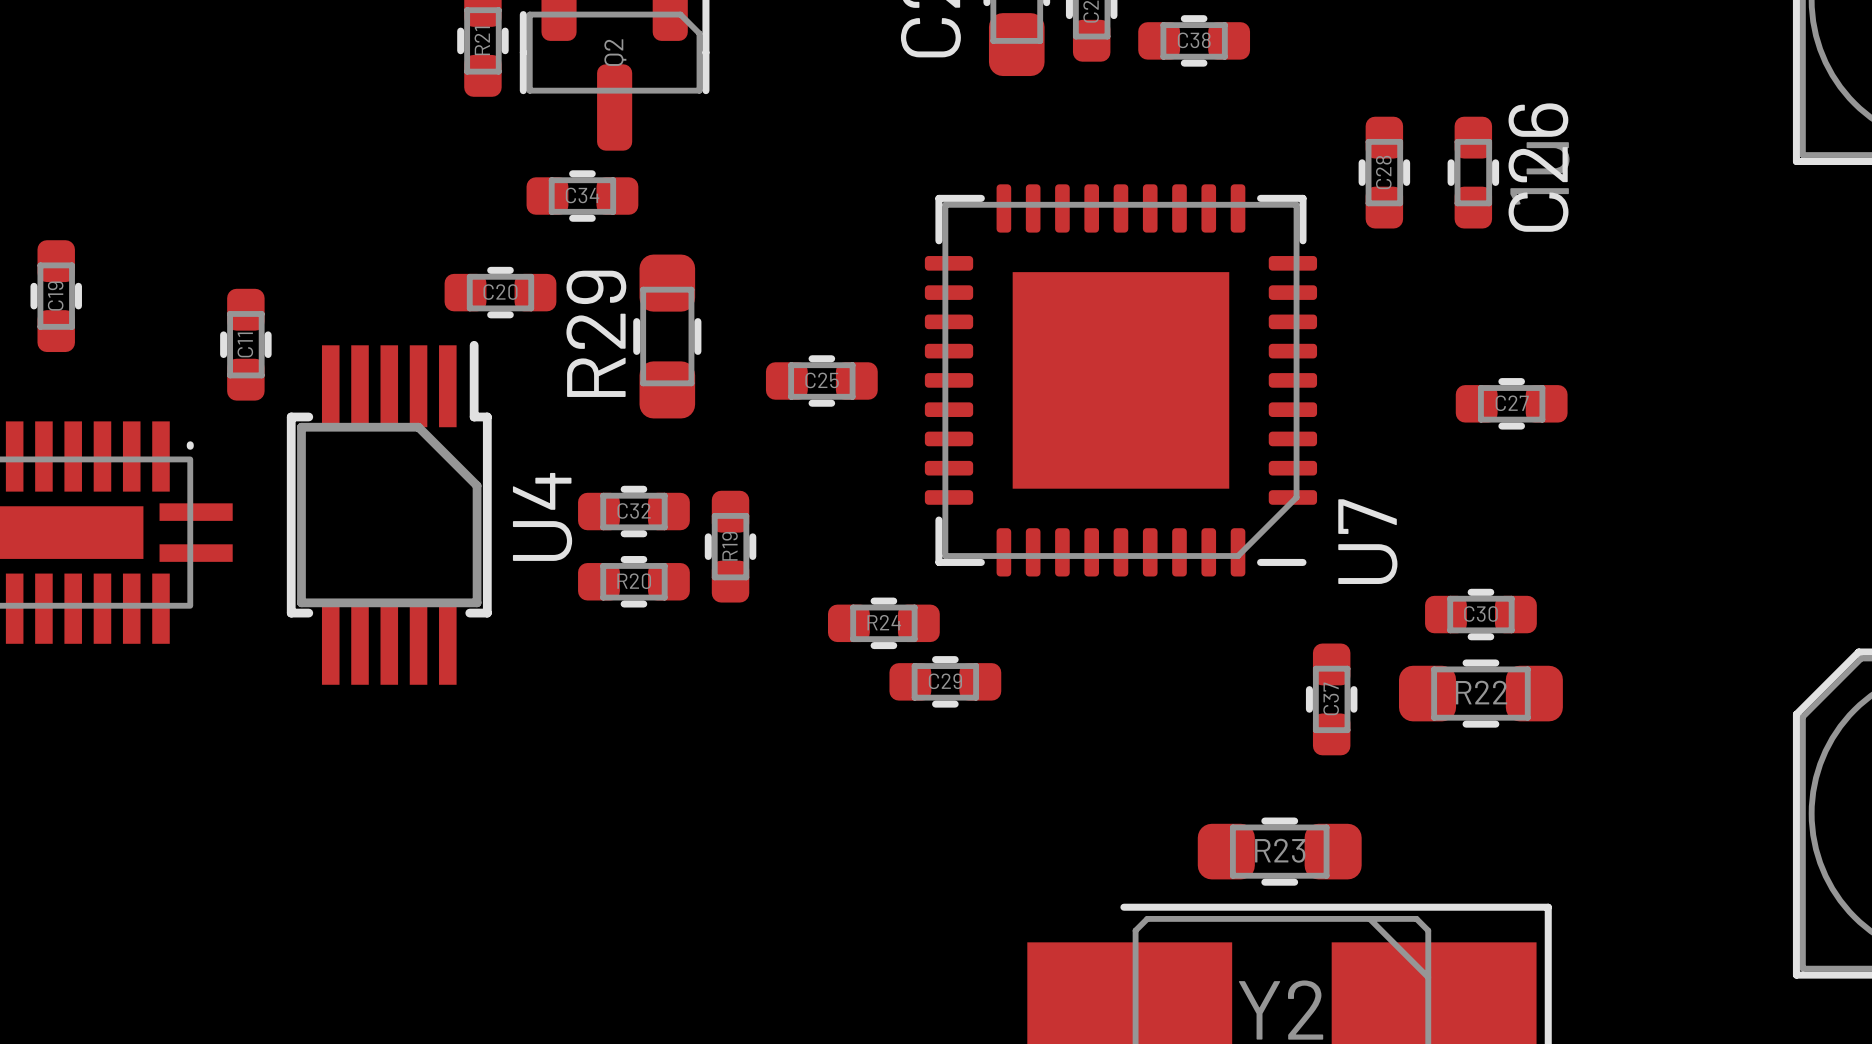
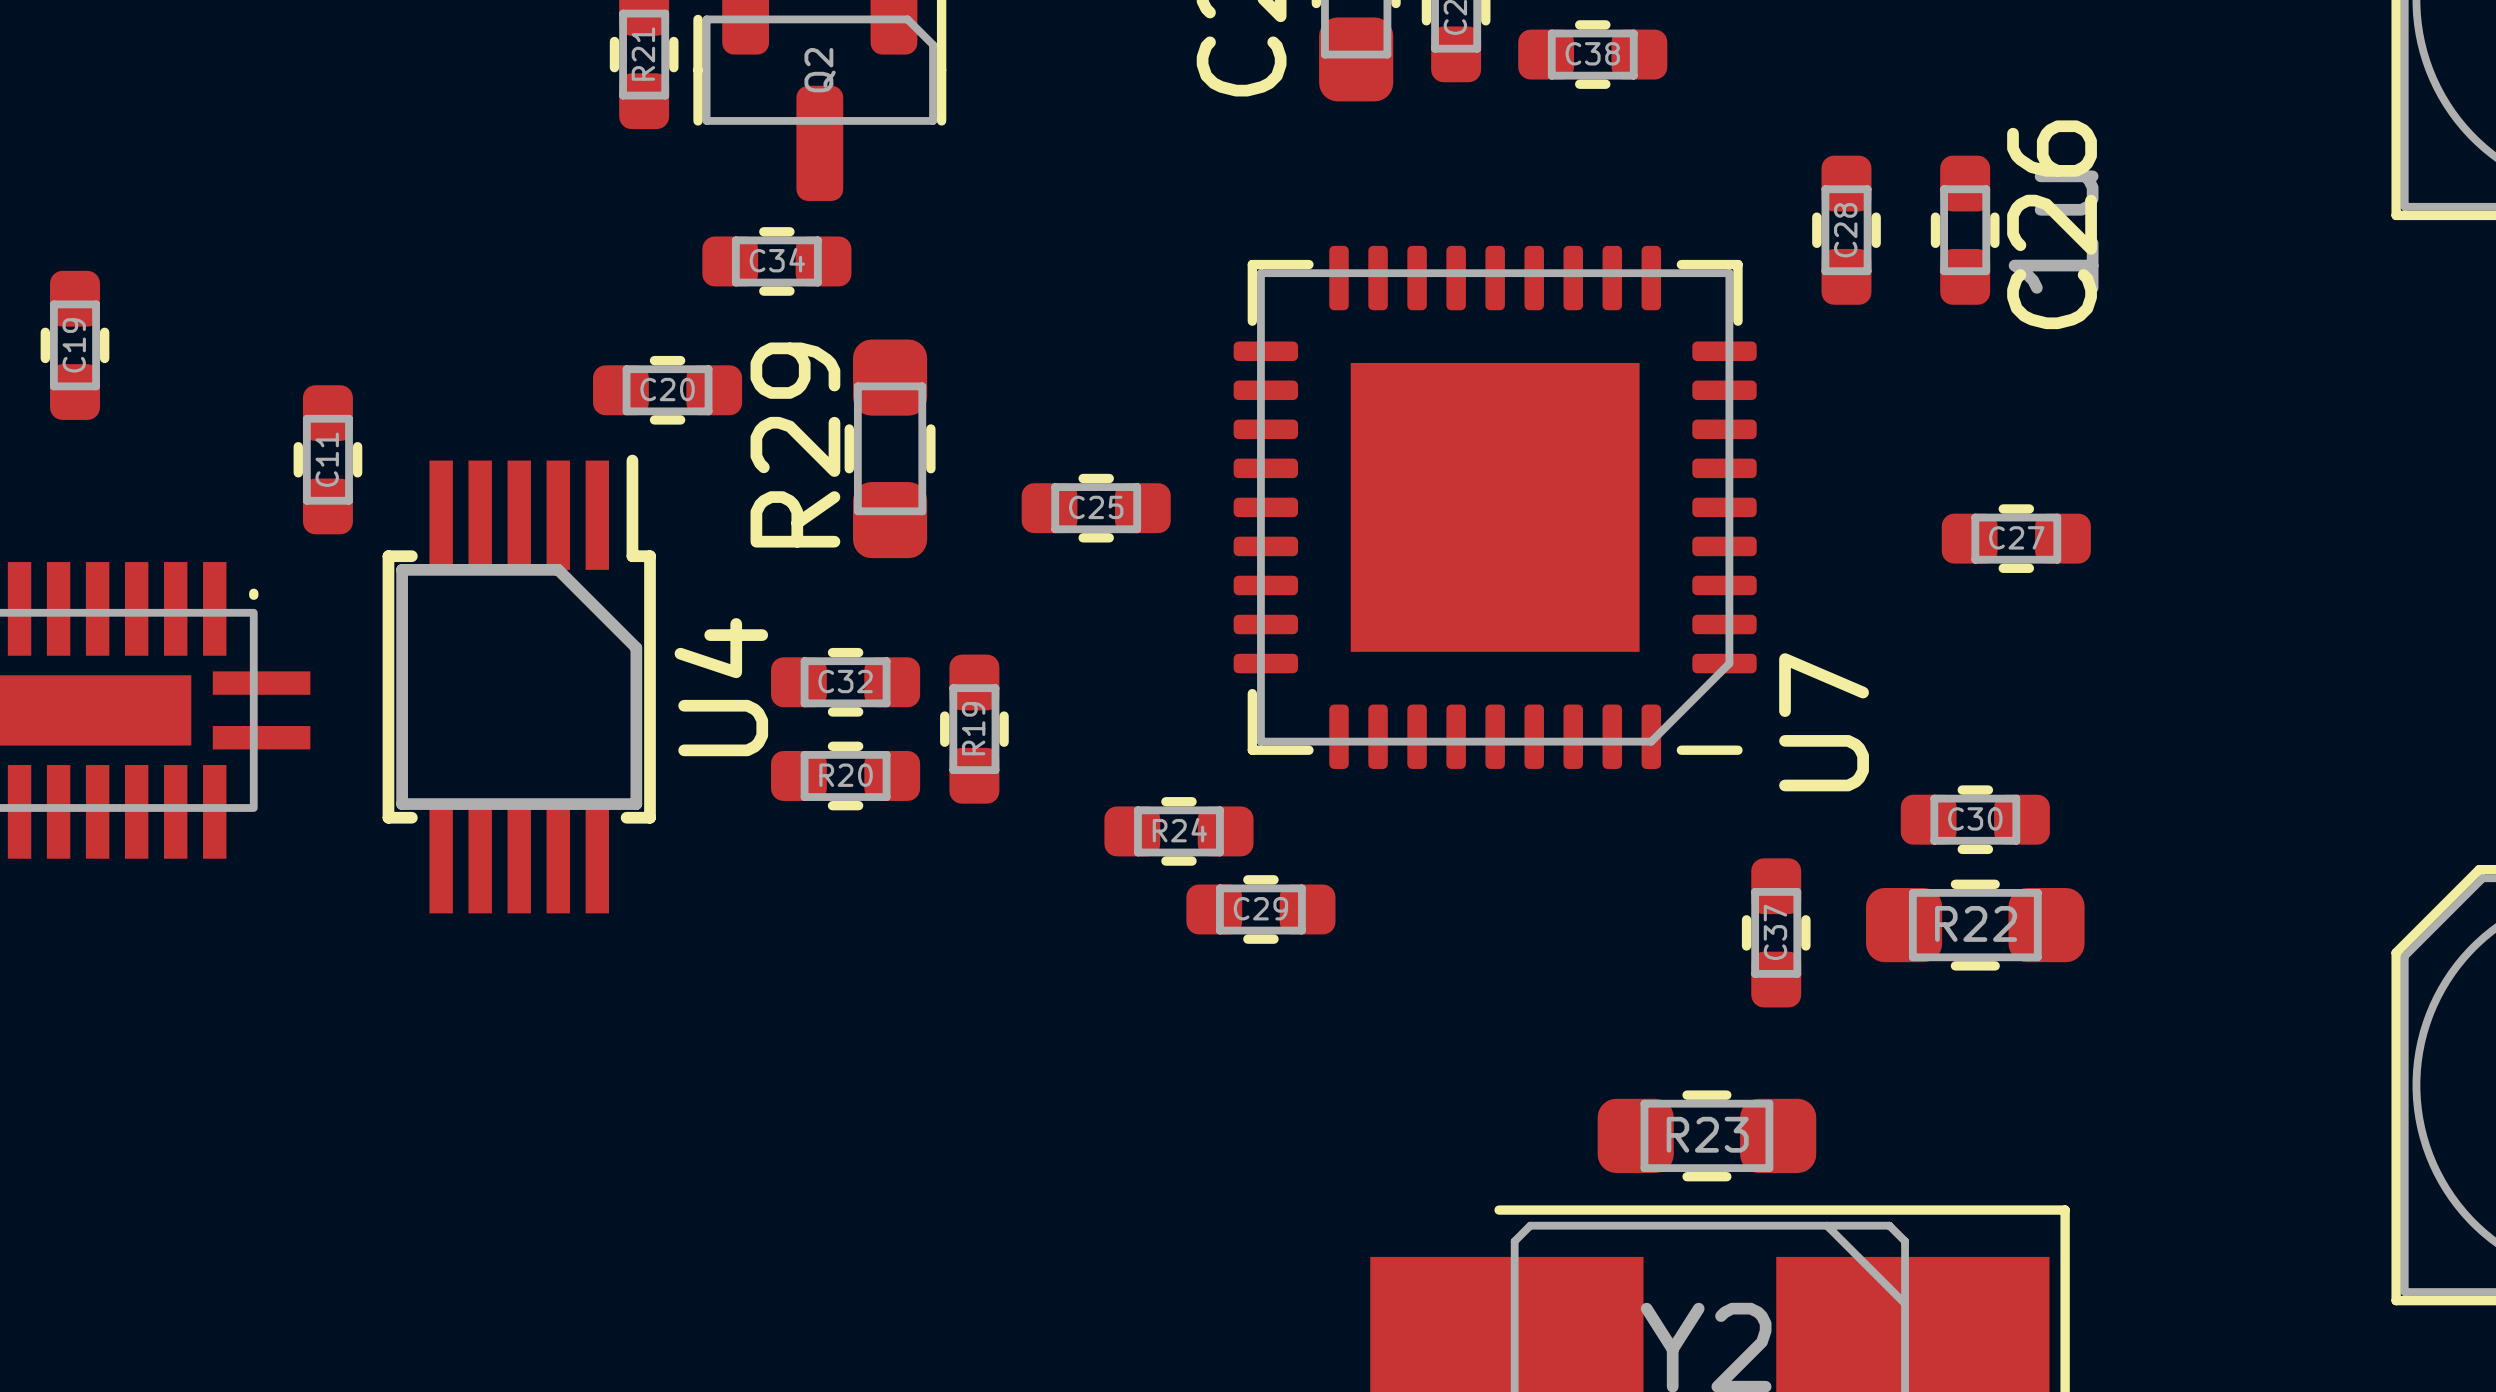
C19 position: (56, 296) -> (74, 345)

